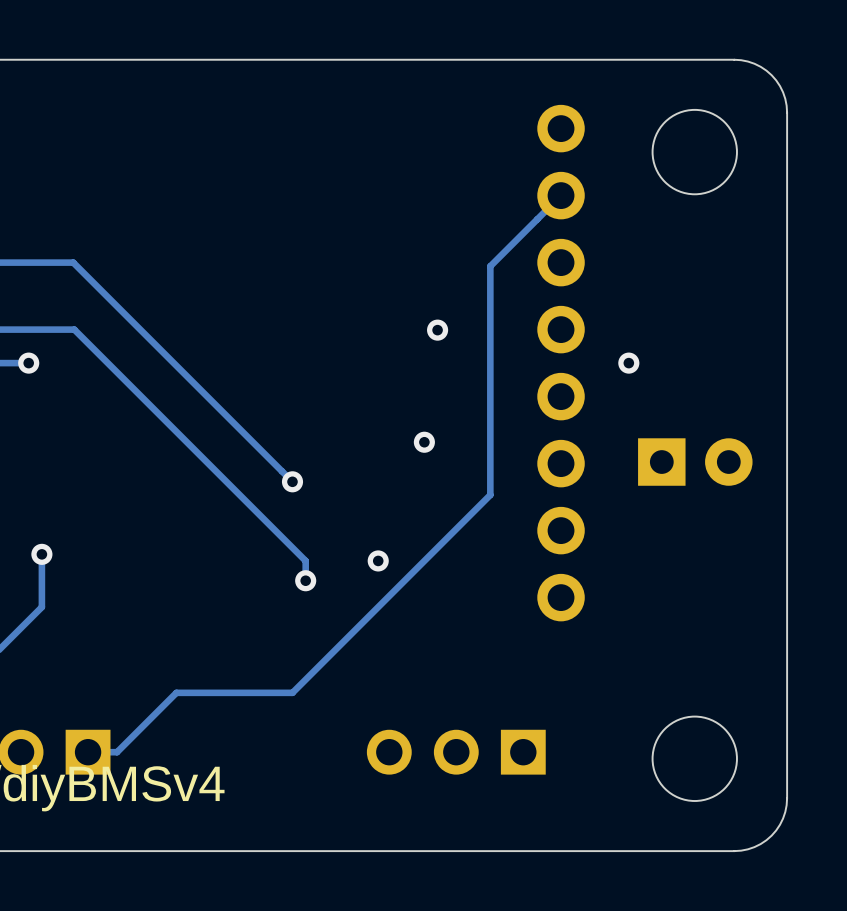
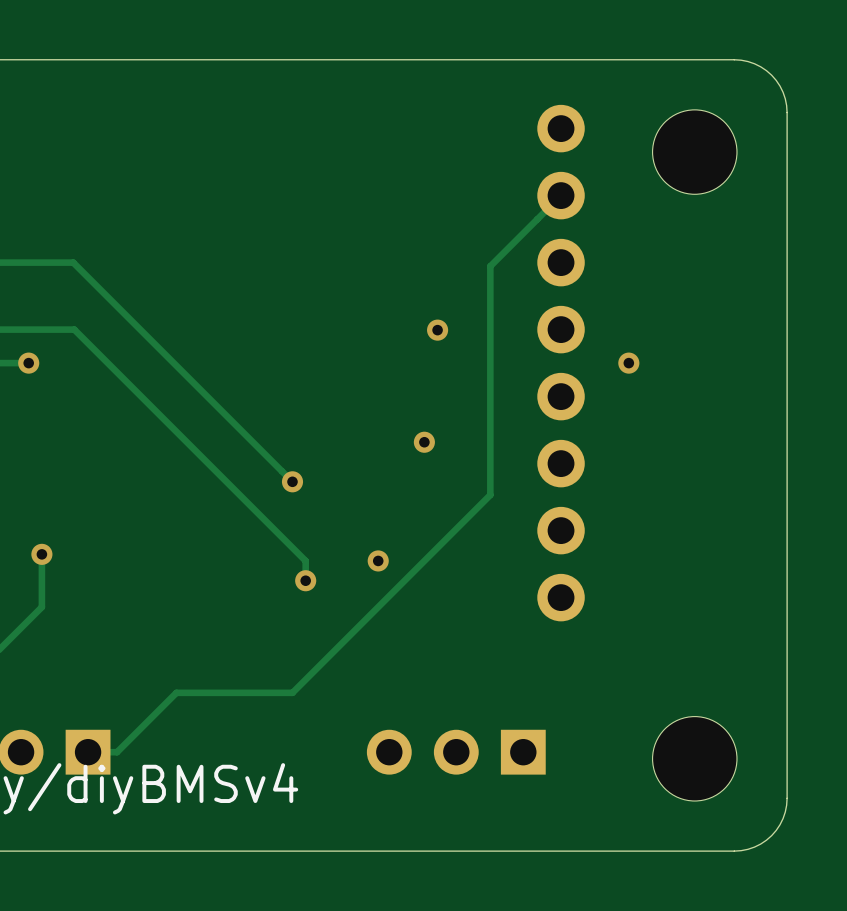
part: (695, 462) -> none

